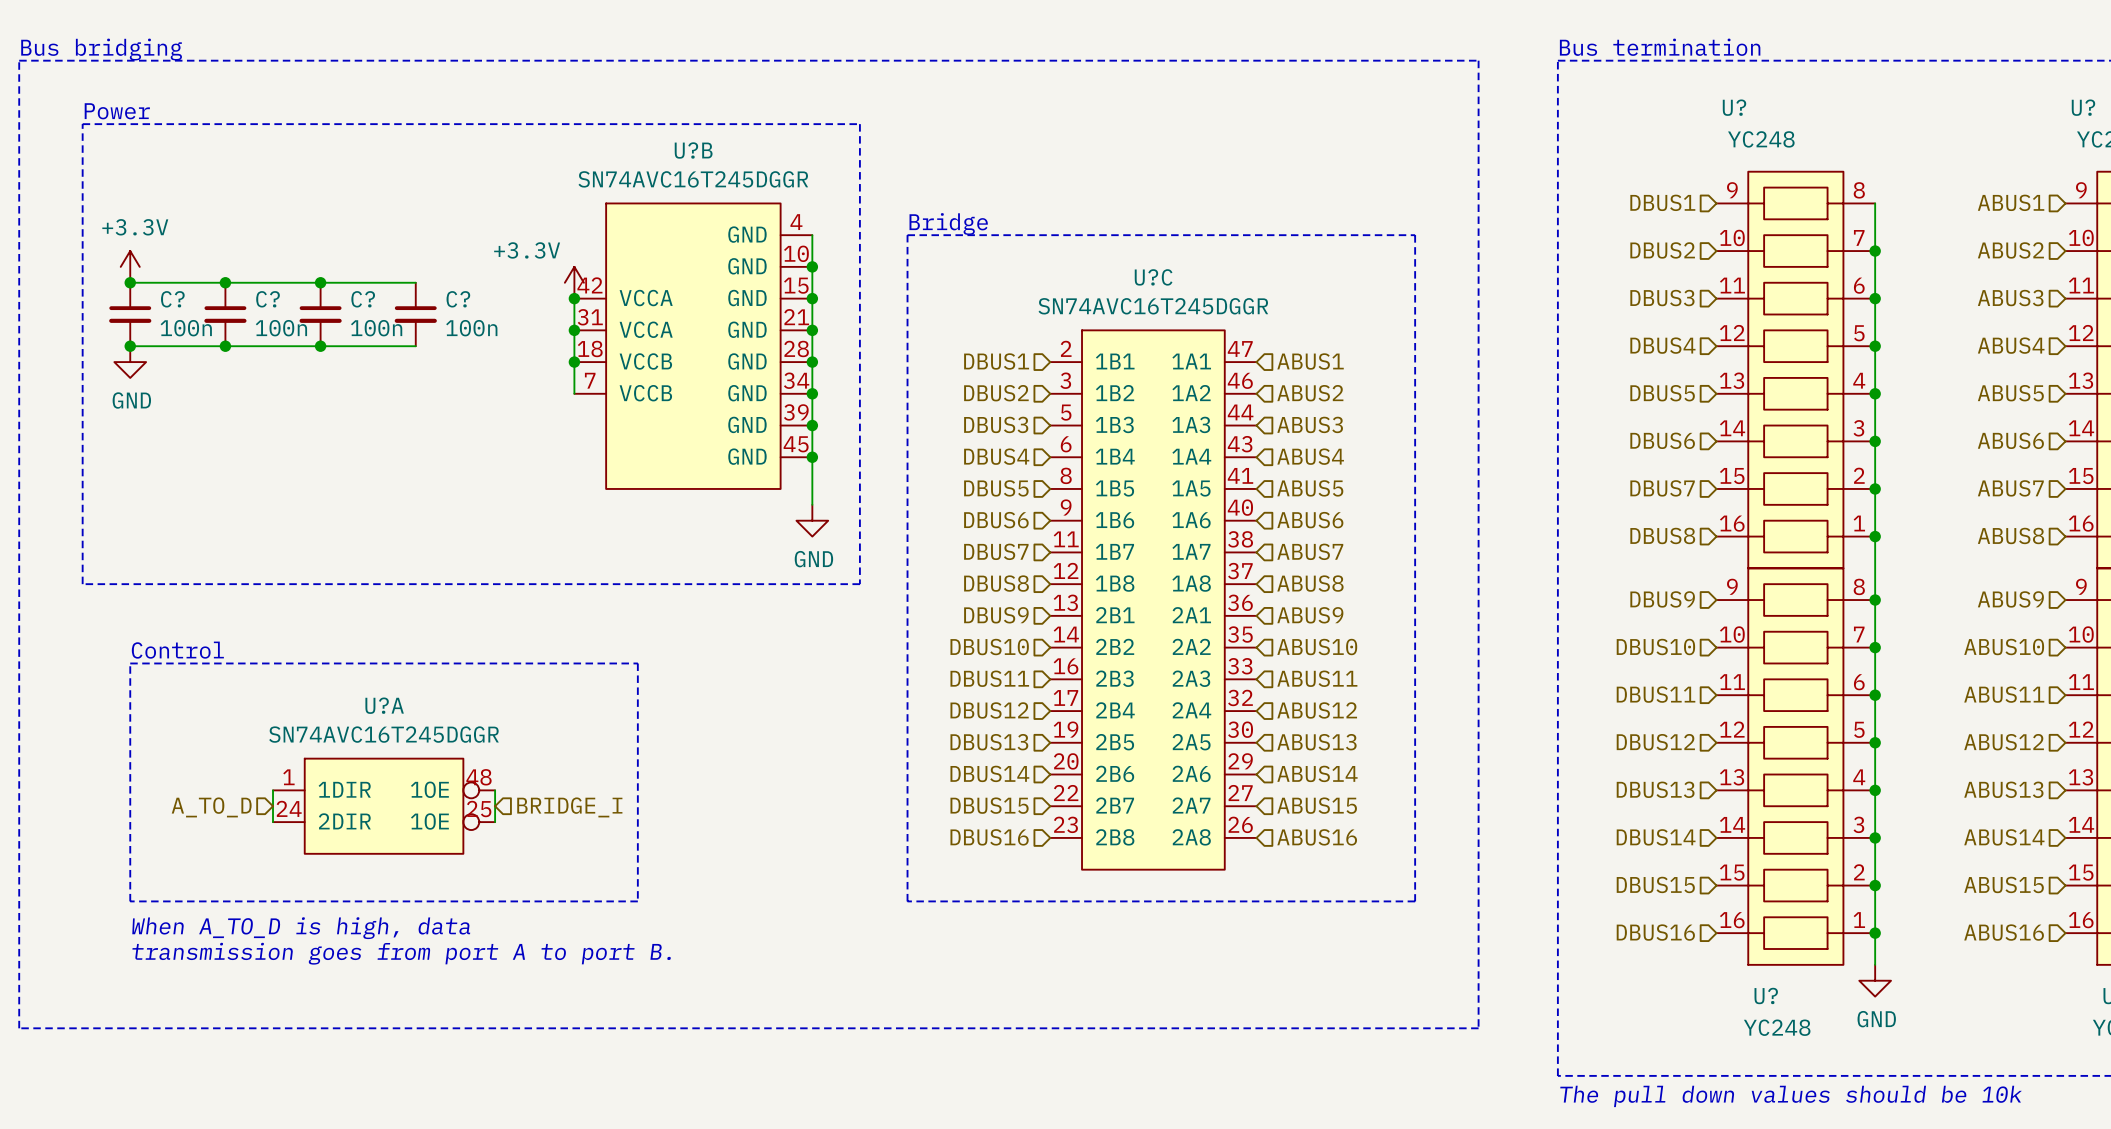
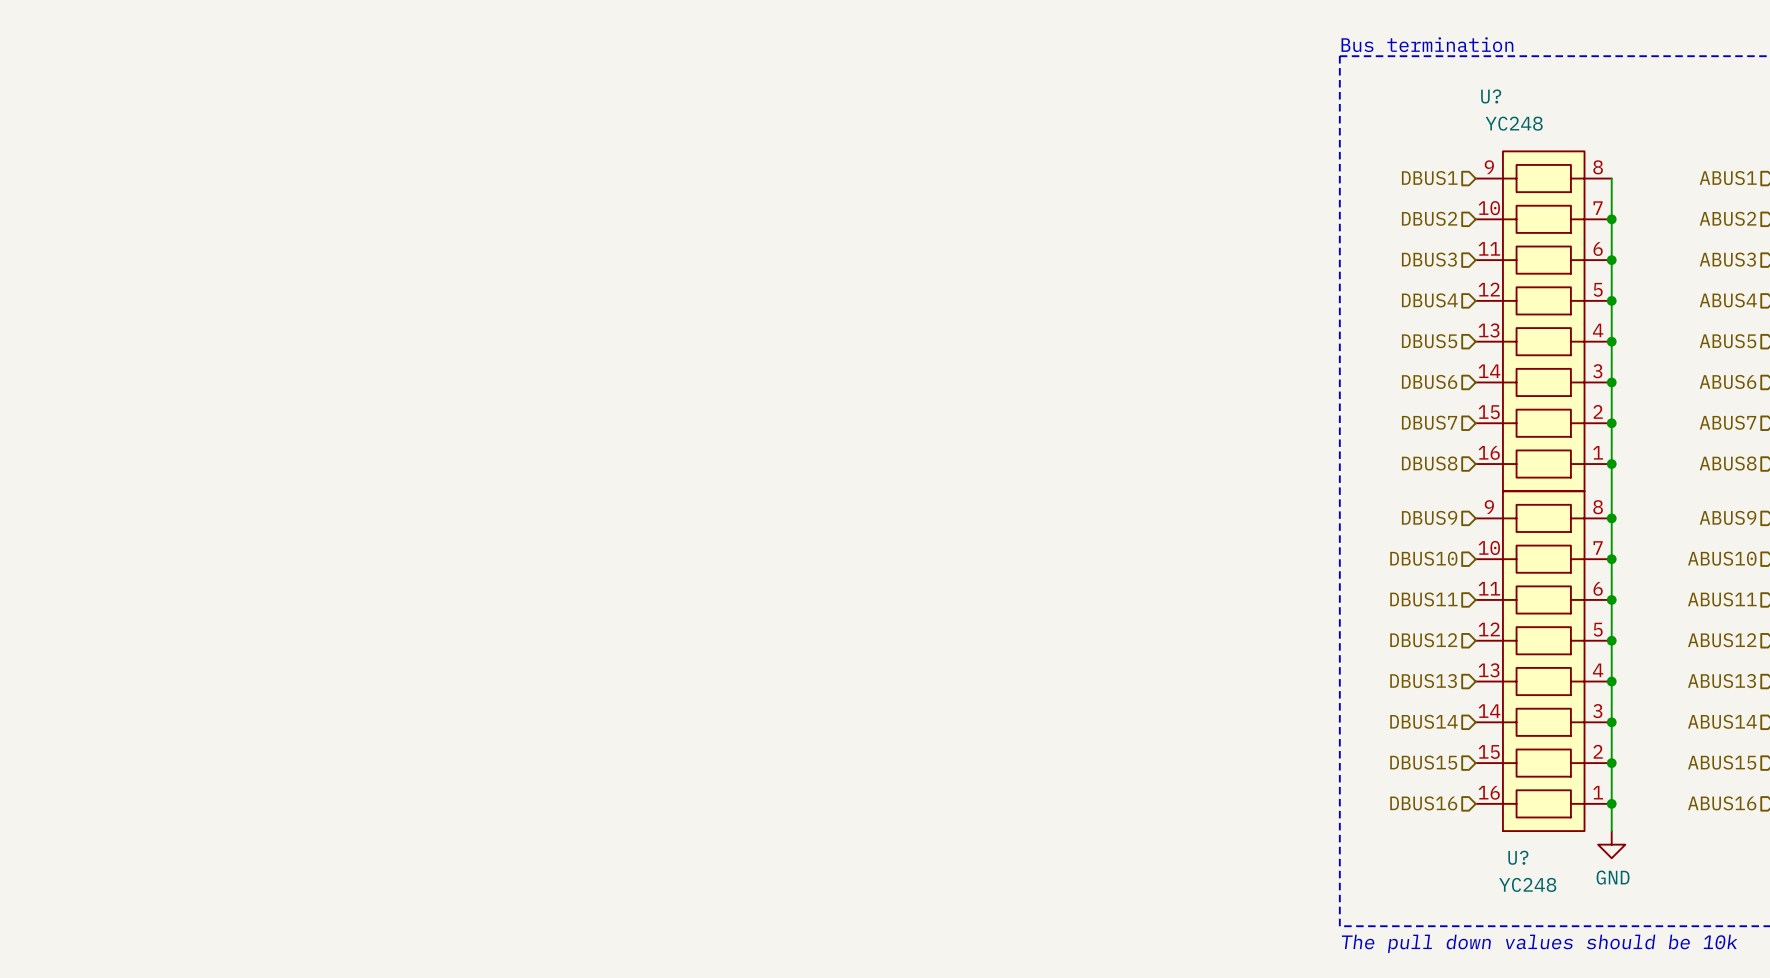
text: Bus bridging (101, 49) -> none
line: (19, 60) (1478, 60) (1478, 1028) (19, 1028) (19, 60) -> none
text: Power (117, 111) -> none
line: (82, 124) (859, 124) (859, 584) (82, 584) (82, 124) -> none
text: Bridge (948, 224) -> none
wire: (812, 235) (812, 504) -> none
line: (907, 235) (1415, 235) (1415, 901) (907, 901) (907, 235) -> none
power symbol: +3.3V (130, 266) -> none
junction: (812, 266) -> none
wire: (130, 282) (415, 282) -> none
junction: (130, 282) -> none
junction: (225, 282) -> none
junction: (320, 282) -> none
power symbol: +3.3V (574, 282) -> none
wire: (574, 298) (574, 393) -> none
junction: (574, 298) -> none
junction: (812, 298) -> none
C?: 100n (130, 314) -> none
C?: 100n (225, 314) -> none
C?: 100n (320, 314) -> none
C?: 100n (415, 314) -> none
junction: (574, 330) -> none
junction: (812, 330) -> none
wire: (130, 346) (415, 346) -> none
junction: (130, 346) -> none
junction: (225, 346) -> none
junction: (320, 346) -> none
U?B: SN74AVC16T245DGGR (693, 346) -> none
hierarchical label: DBUS1 (996, 361) -> none
hierarchical label: ABUS1 (1310, 361) -> none
power symbol: GND (130, 362) -> none
junction: (574, 362) -> none
junction: (812, 362) -> none
junction: (812, 393) -> none
hierarchical label: DBUS2 (996, 393) -> none
hierarchical label: ABUS2 (1310, 393) -> none
hierarchical label: DBUS3 (996, 424) -> none
hierarchical label: ABUS3 (1310, 424) -> none
junction: (812, 425) -> none
hierarchical label: DBUS4 (996, 456) -> none
hierarchical label: ABUS4 (1310, 456) -> none
junction: (812, 457) -> none
hierarchical label: DBUS5 (996, 488) -> none
hierarchical label: ABUS5 (1310, 488) -> none
power symbol: GND (812, 520) -> none
hierarchical label: DBUS6 (996, 520) -> none
hierarchical label: ABUS6 (1310, 520) -> none
hierarchical label: DBUS7 (996, 551) -> none
hierarchical label: ABUS7 (1310, 551) -> none
hierarchical label: DBUS8 (996, 583) -> none
hierarchical label: ABUS8 (1310, 583) -> none
U?C: SN74AVC16T245DGGR (1153, 600) -> none
hierarchical label: DBUS9 (996, 615) -> none
hierarchical label: ABUS9 (1310, 615) -> none
hierarchical label: DBUS10 (989, 647) -> none
hierarchical label: ABUS10 (1317, 647) -> none
text: Control (177, 650) -> none
line: (130, 663) (637, 663) (637, 901) (130, 901) (130, 663) -> none
hierarchical label: DBUS11 (989, 678) -> none
hierarchical label: ABUS11 (1317, 678) -> none
hierarchical label: DBUS12 (989, 710) -> none
hierarchical label: ABUS12 (1317, 710) -> none
hierarchical label: DBUS13 (989, 742) -> none
hierarchical label: ABUS13 (1316, 742) -> none
hierarchical label: DBUS14 (989, 773) -> none
hierarchical label: ABUS14 (1317, 773) -> none
wire: (273, 790) (273, 822) -> none
wire: (495, 790) (495, 822) -> none
hierarchical label: DBUS15 (989, 805) -> none
hierarchical label: ABUS15 (1317, 805) -> none
U?A: SN74AVC16T245DGGR (384, 806) -> none
hierarchical label: A_TO_D (211, 807) -> none
hierarchical label: BRIDGE_I (569, 807) -> none
hierarchical label: DBUS16 (989, 837) -> none
hierarchical label: ABUS16 (1317, 837) -> none
text: When A_TO_D is high, data (301, 928) -> none
text: transmission goes from port A to port B. (401, 953) -> none

